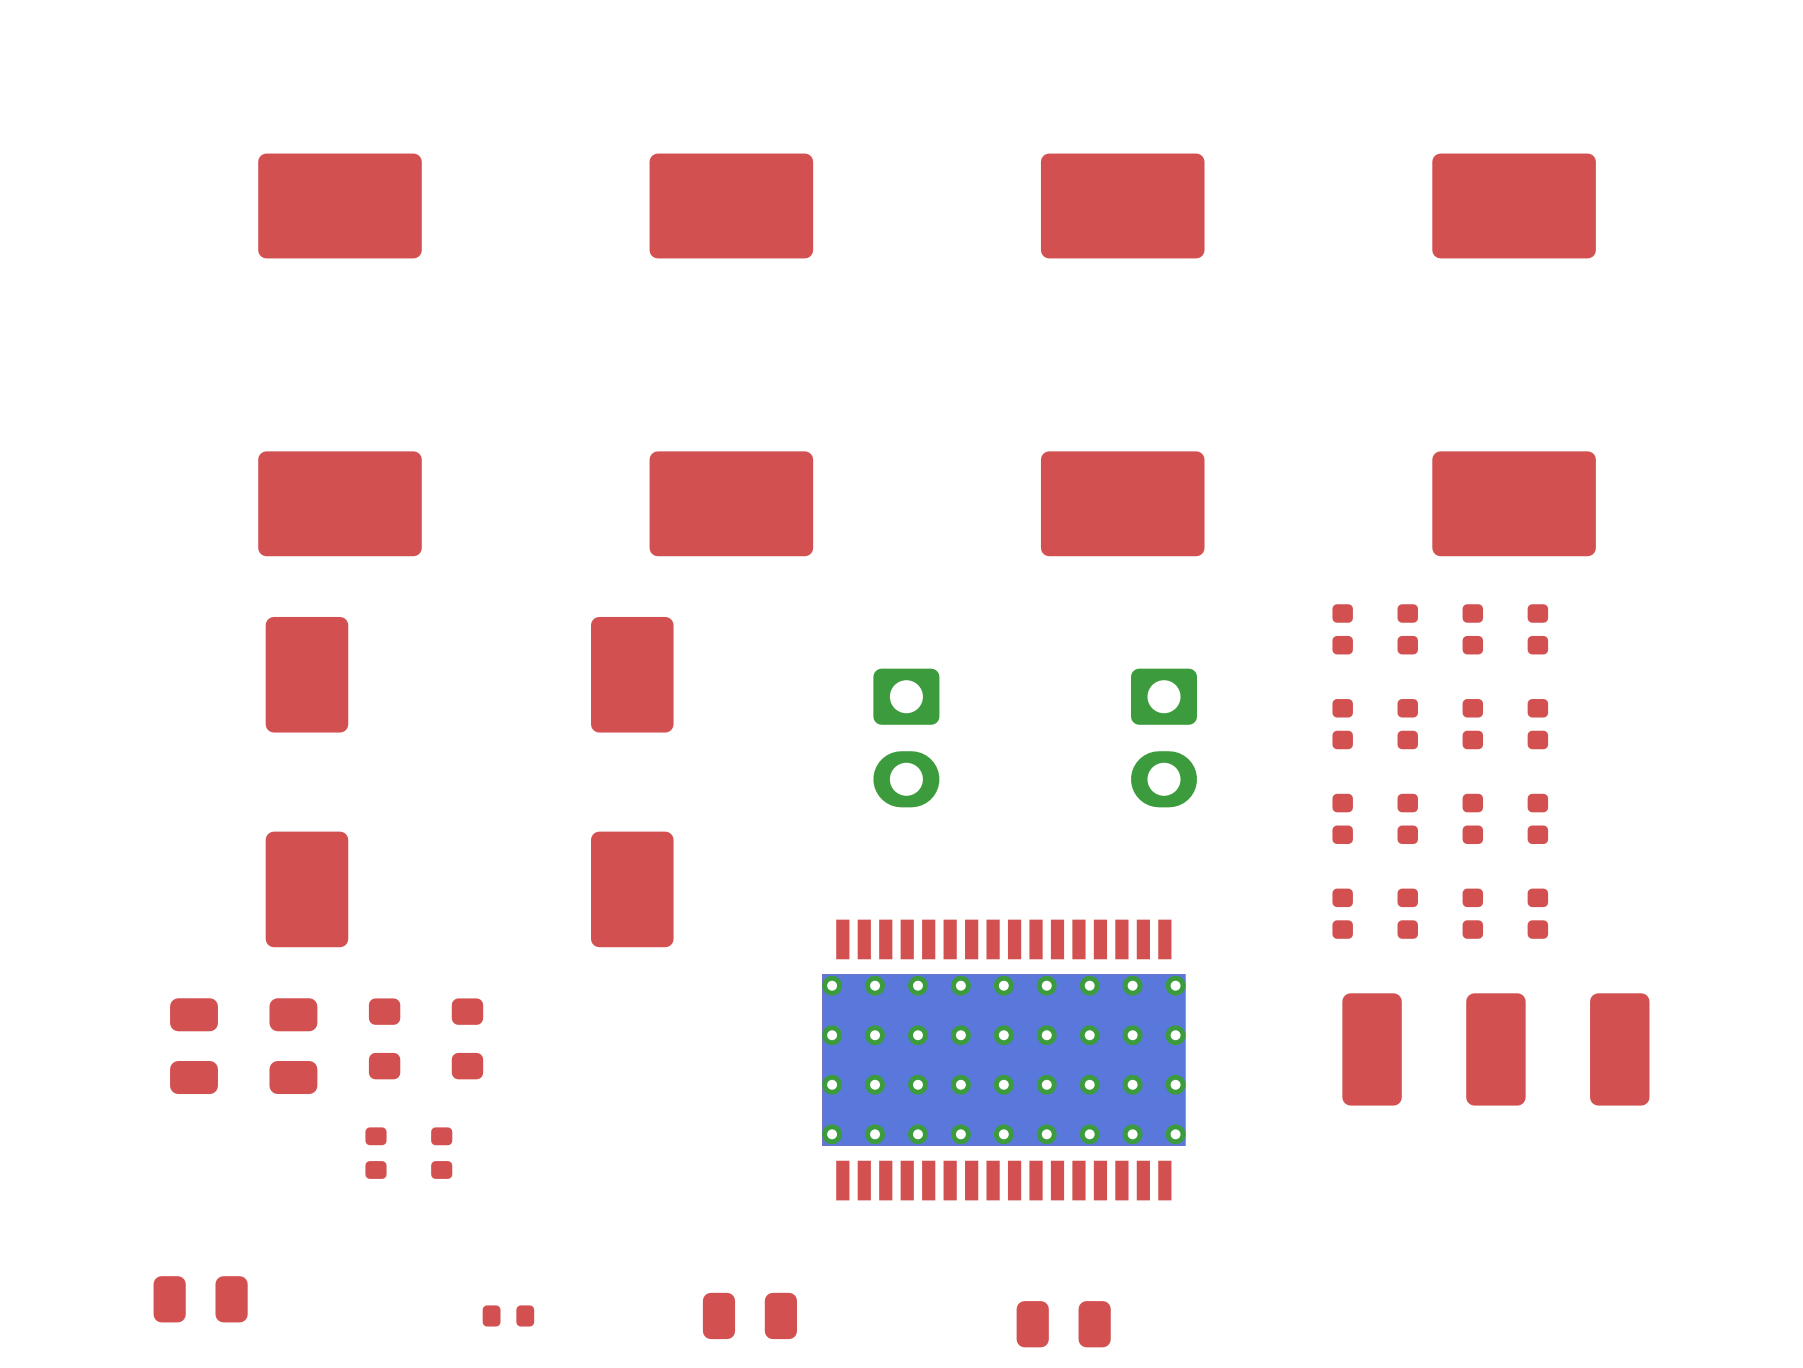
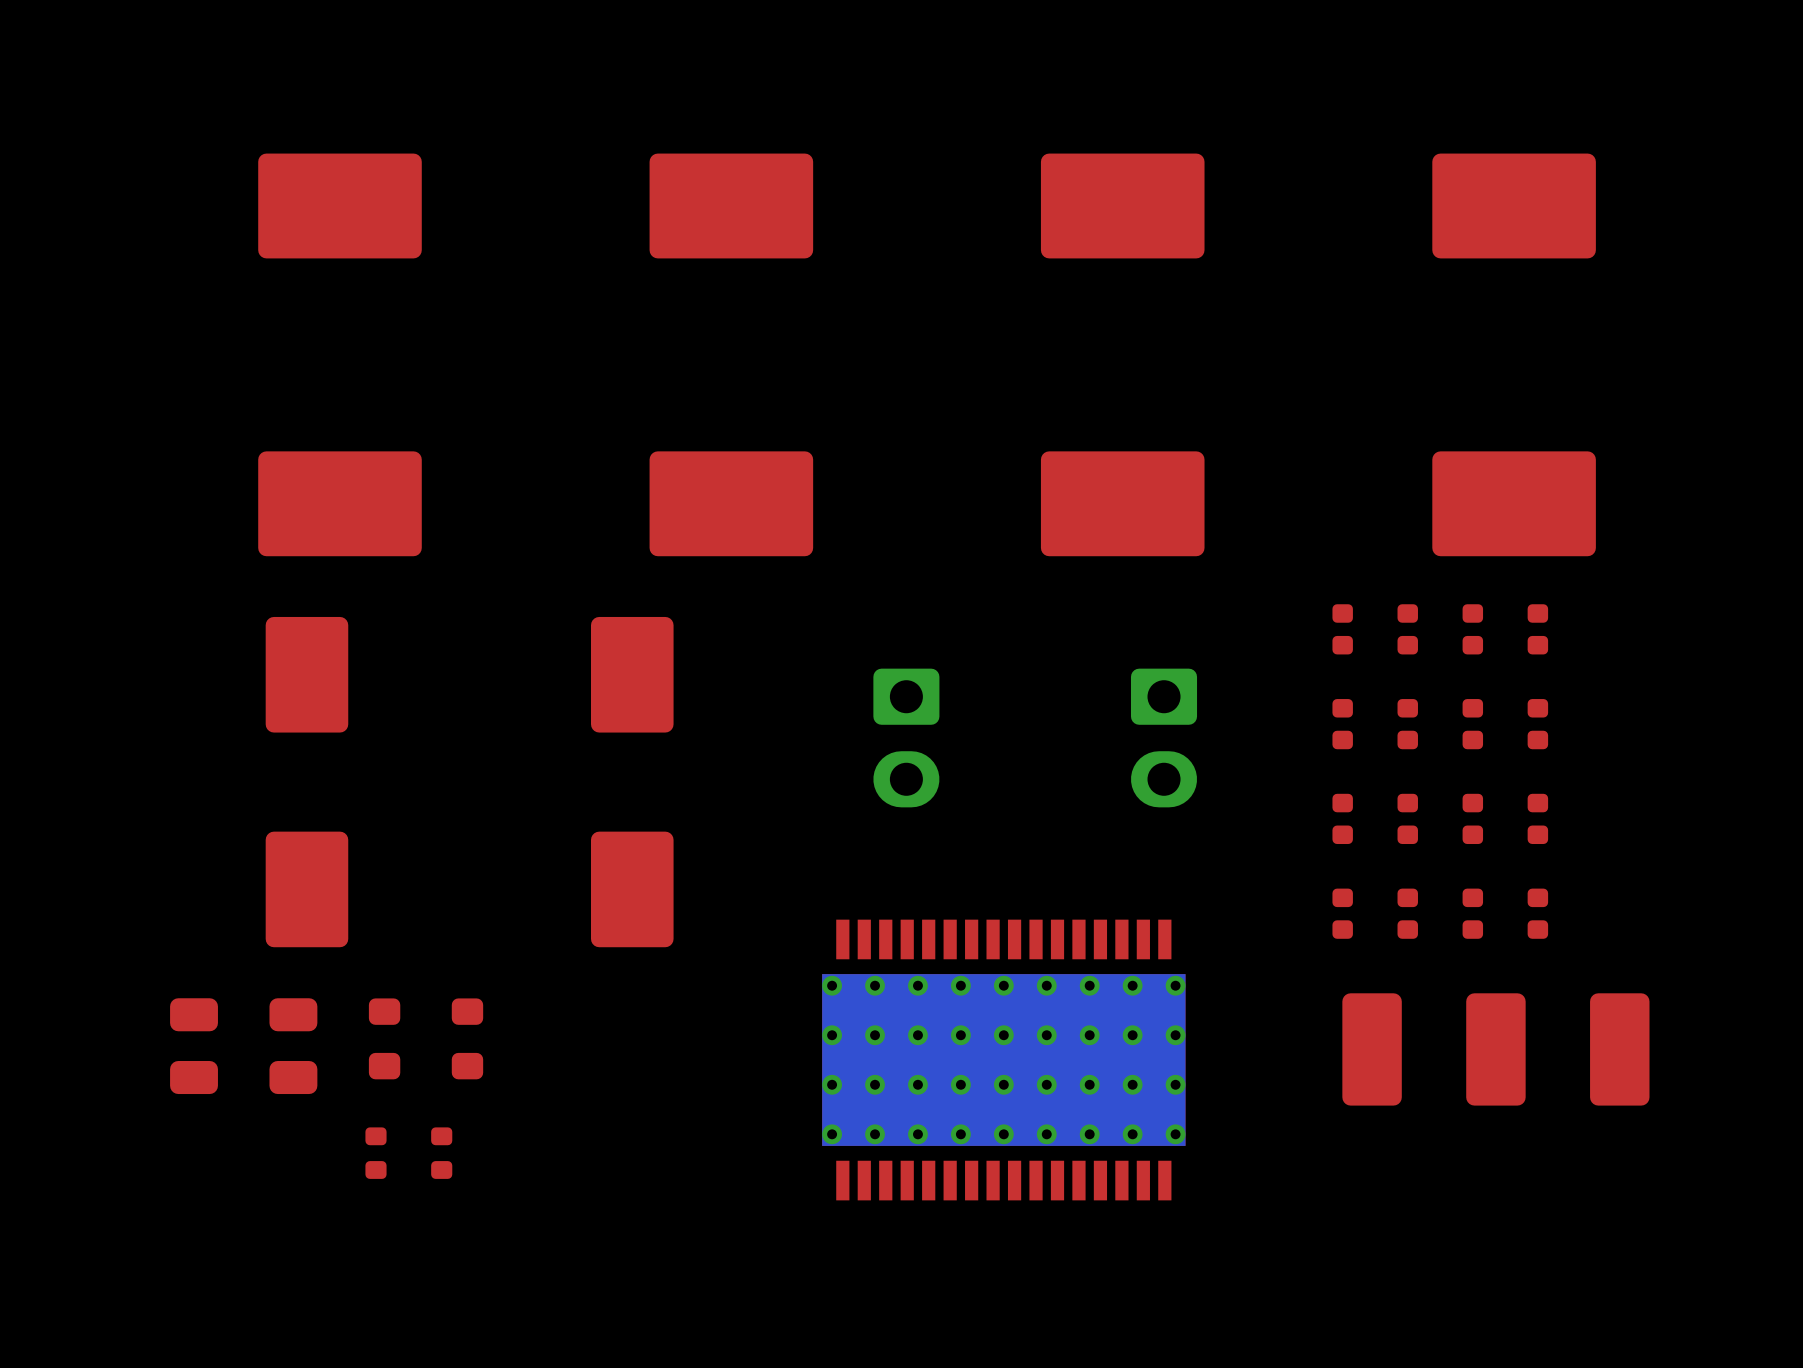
part: (200, 1299) -> none
part: (508, 1315) -> none
part: (749, 1315) -> none
part: (1063, 1324) -> none

